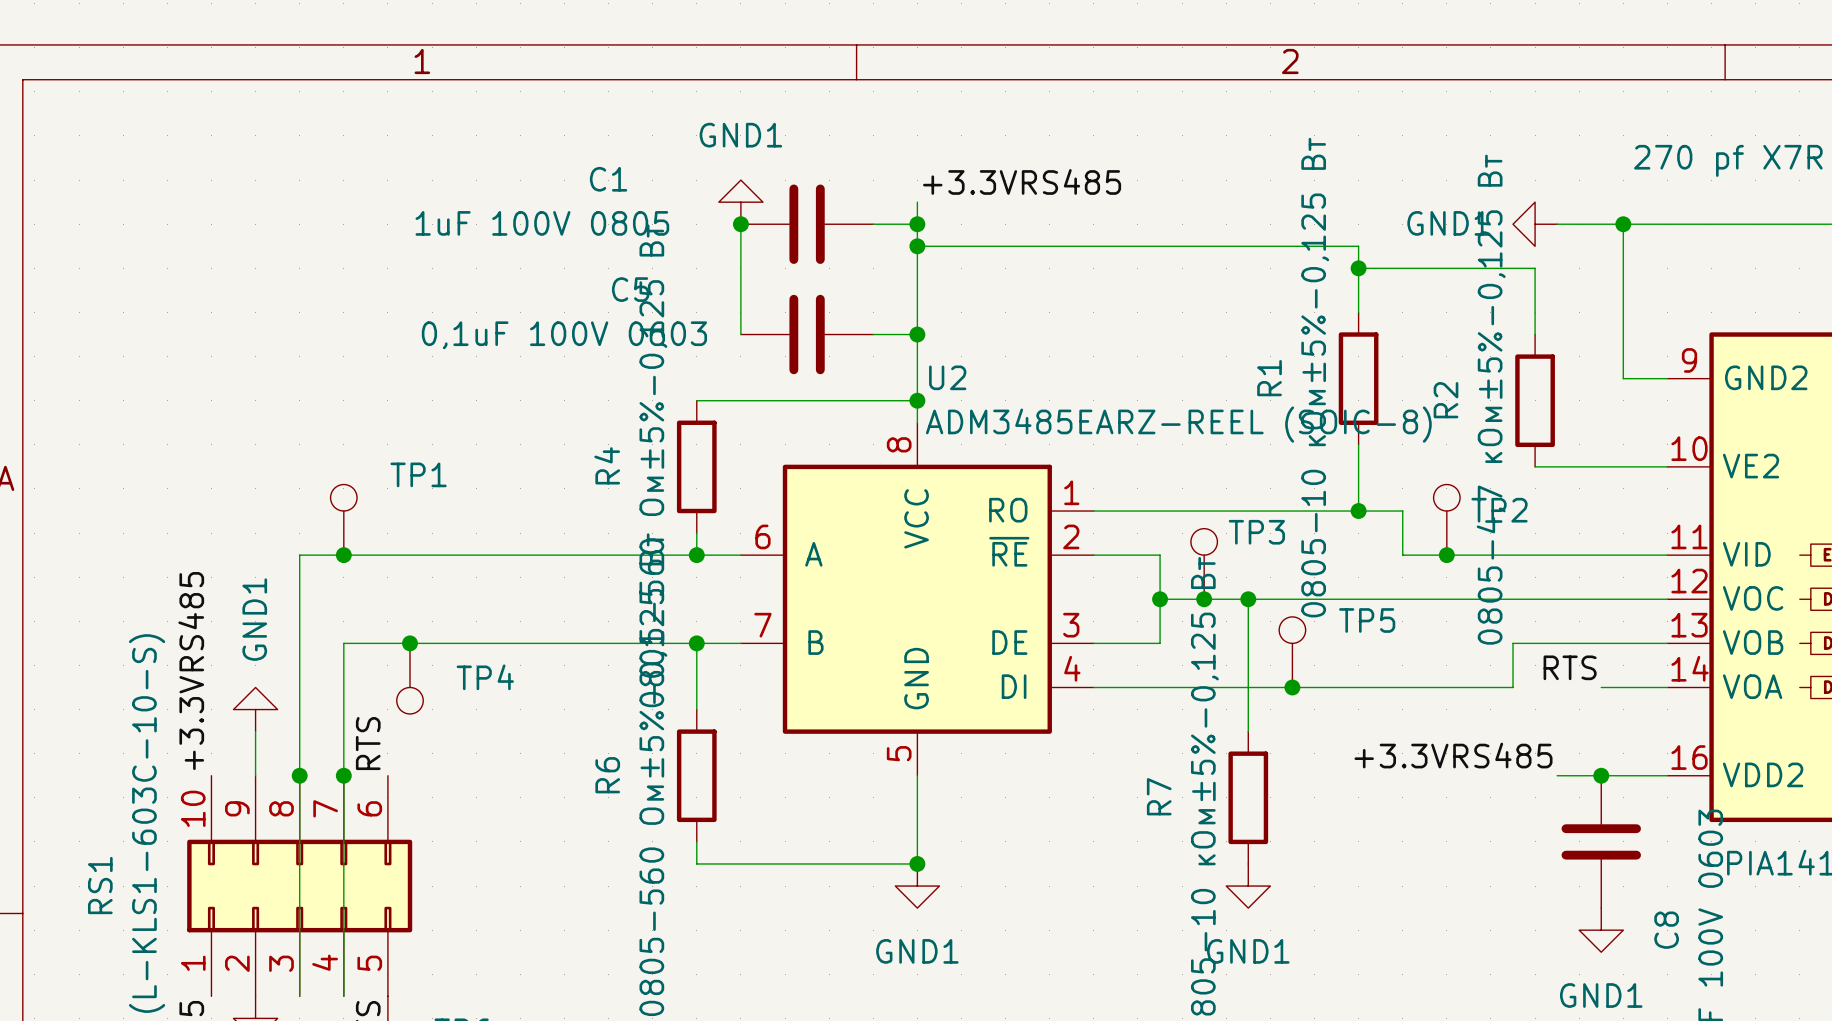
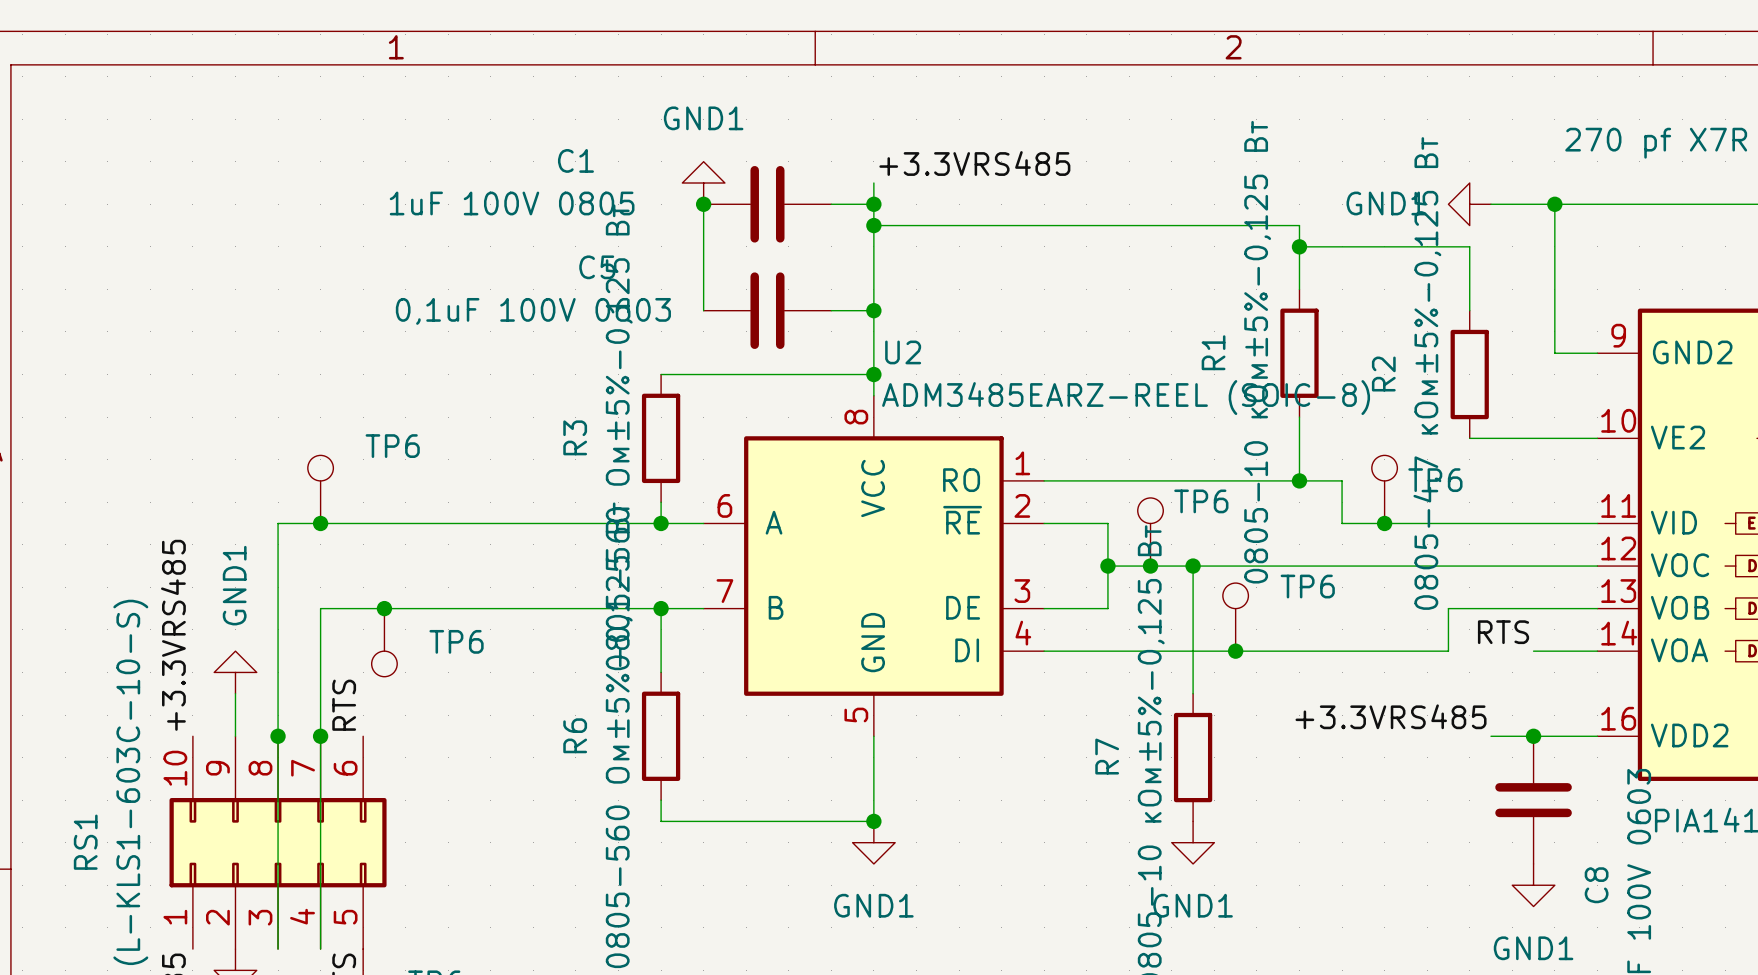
R4 name: R4 (607, 465) -> R3 (575, 437)
TP1 name: TP1 (418, 474) -> TP6 (392, 446)
TP2 name: TP2 (1499, 510) -> TP6 (1435, 480)
TP3 name: TP3 (1256, 532) -> TP6 (1201, 501)
TP5 name: TP5 (1367, 620) -> TP6 (1307, 586)
TP4 name: TP4 (485, 677) -> TP6 (456, 641)

